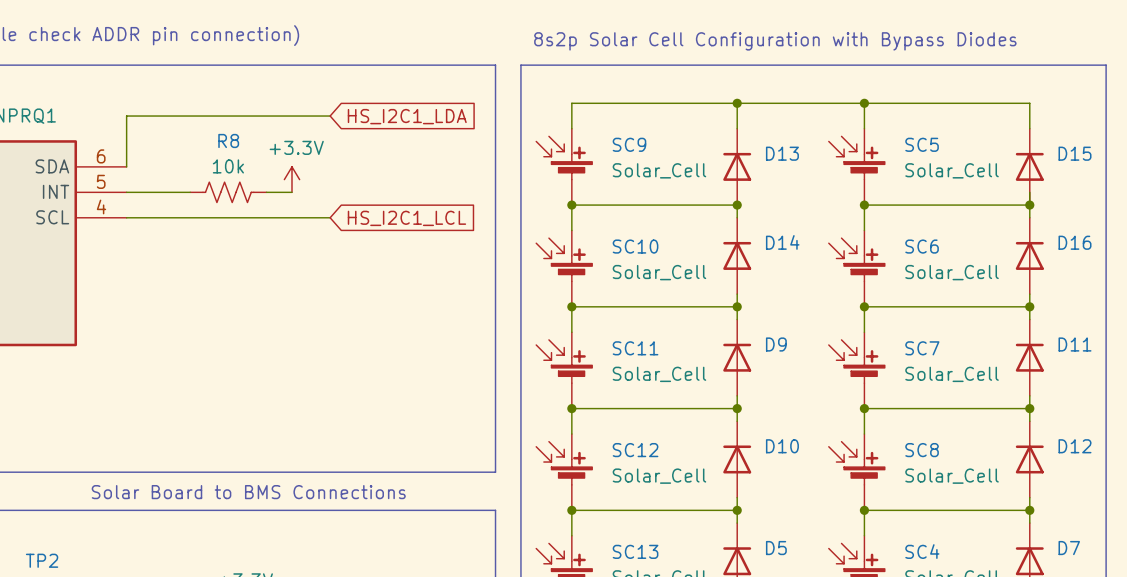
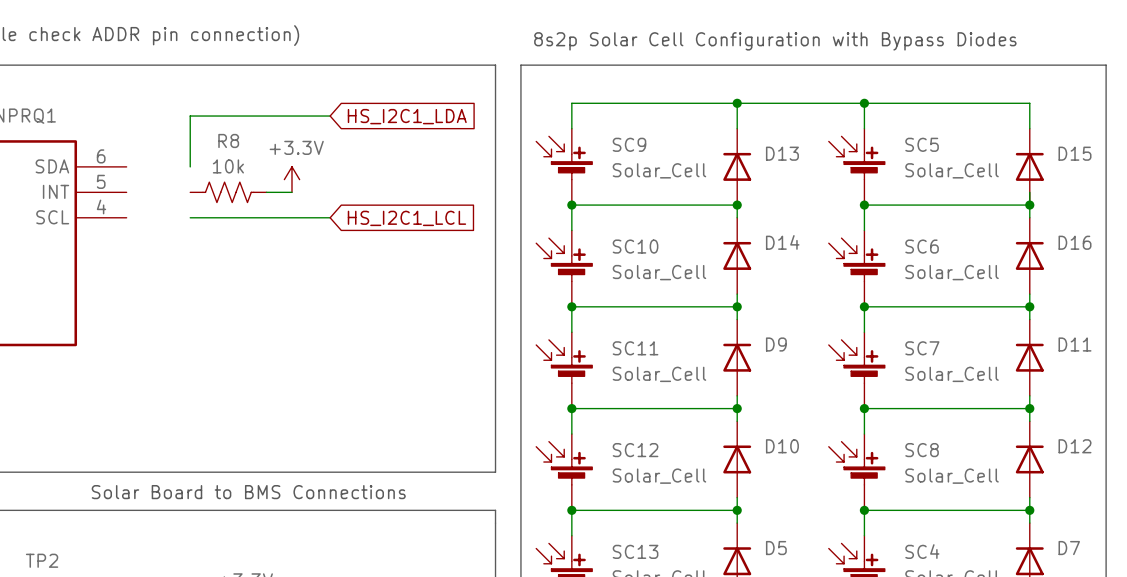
wire: (190, 116) (126, 116) (126, 166) -> (190, 116) (190, 166)
wire: (126, 192) (190, 192) -> none
wire: (126, 217) (190, 217) -> none

